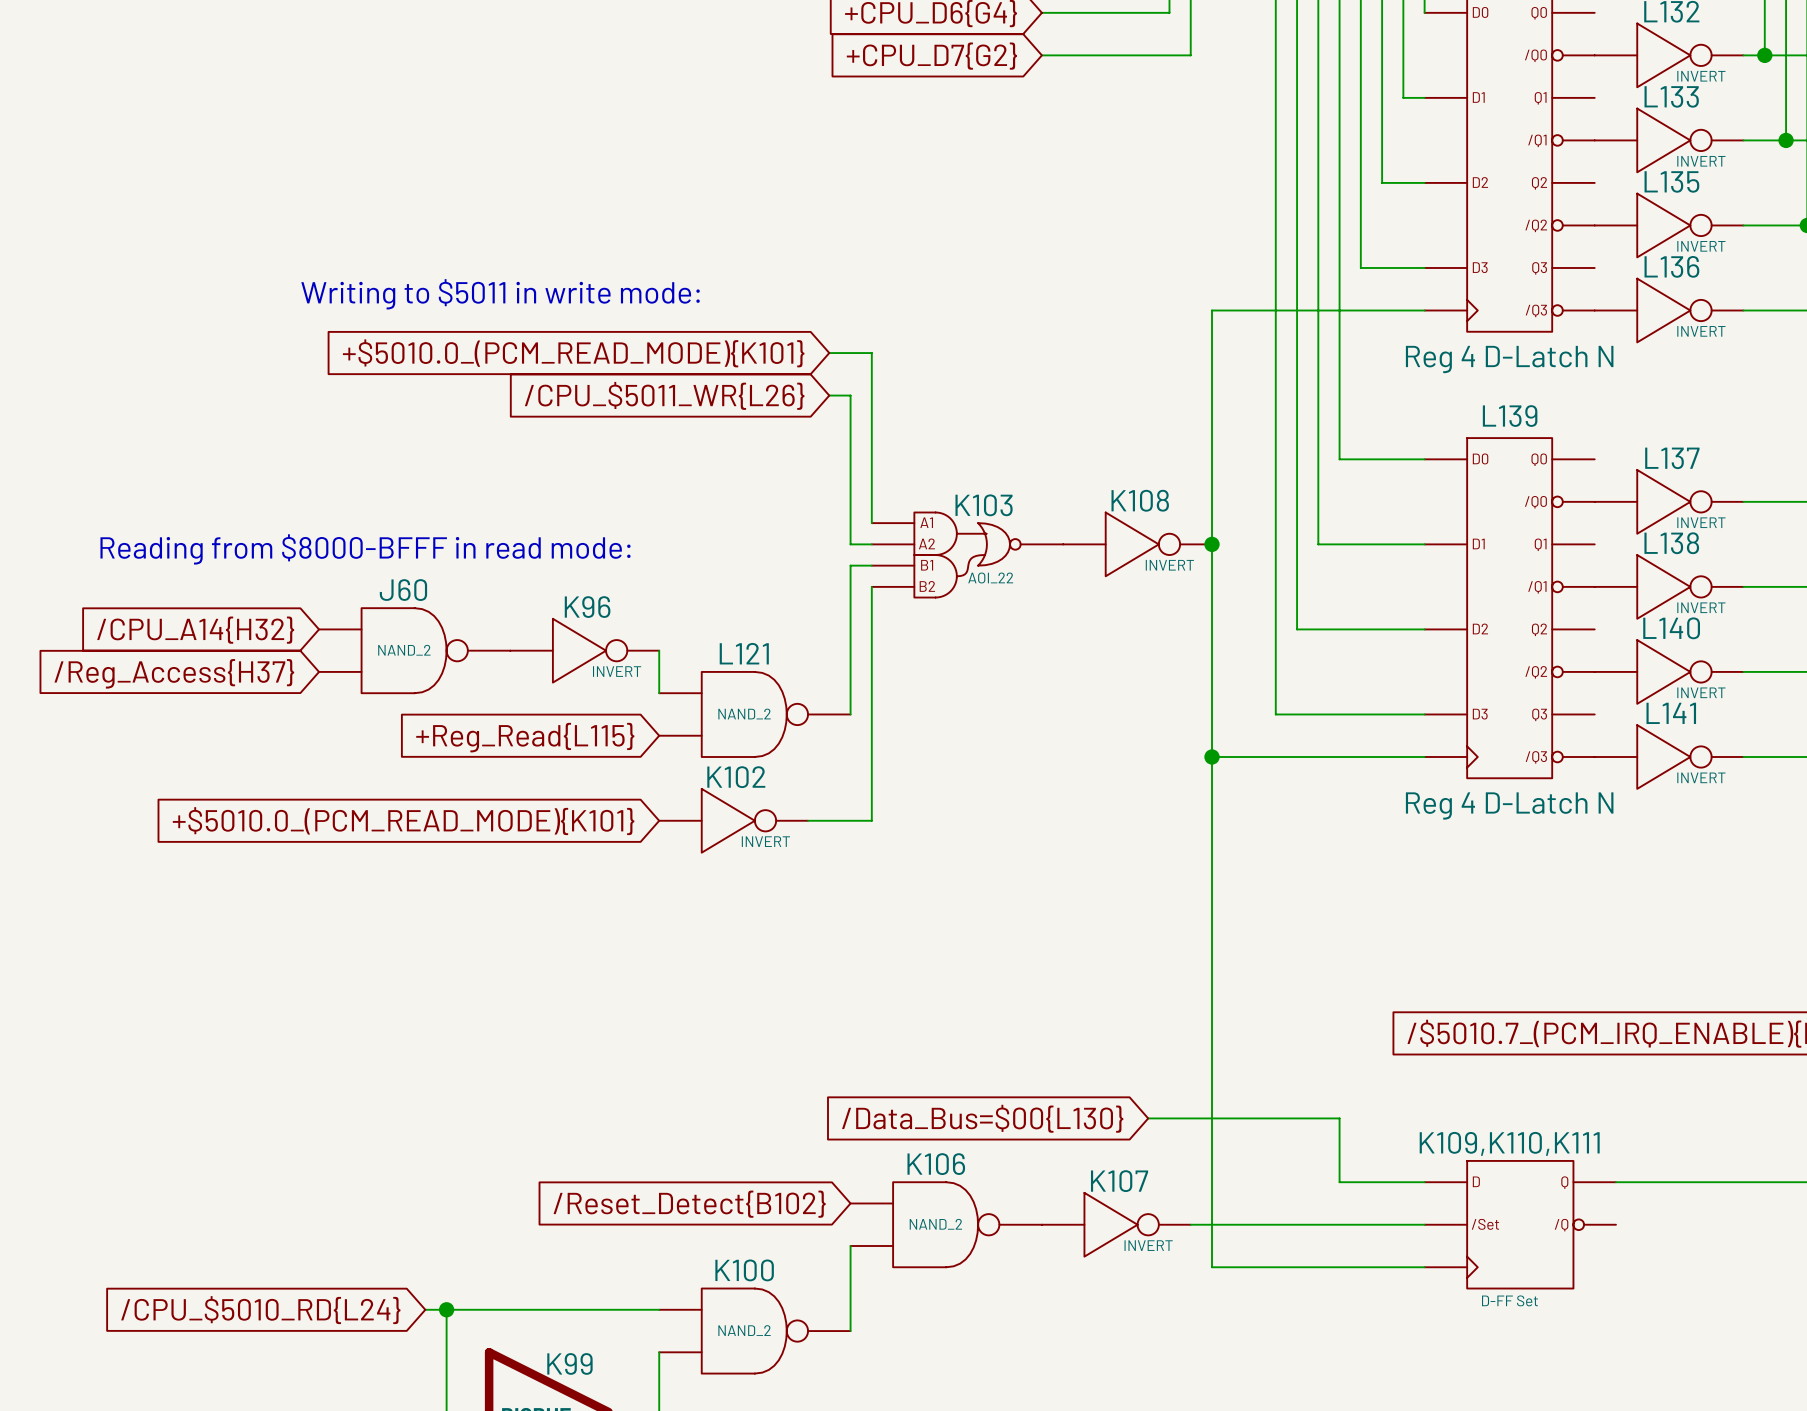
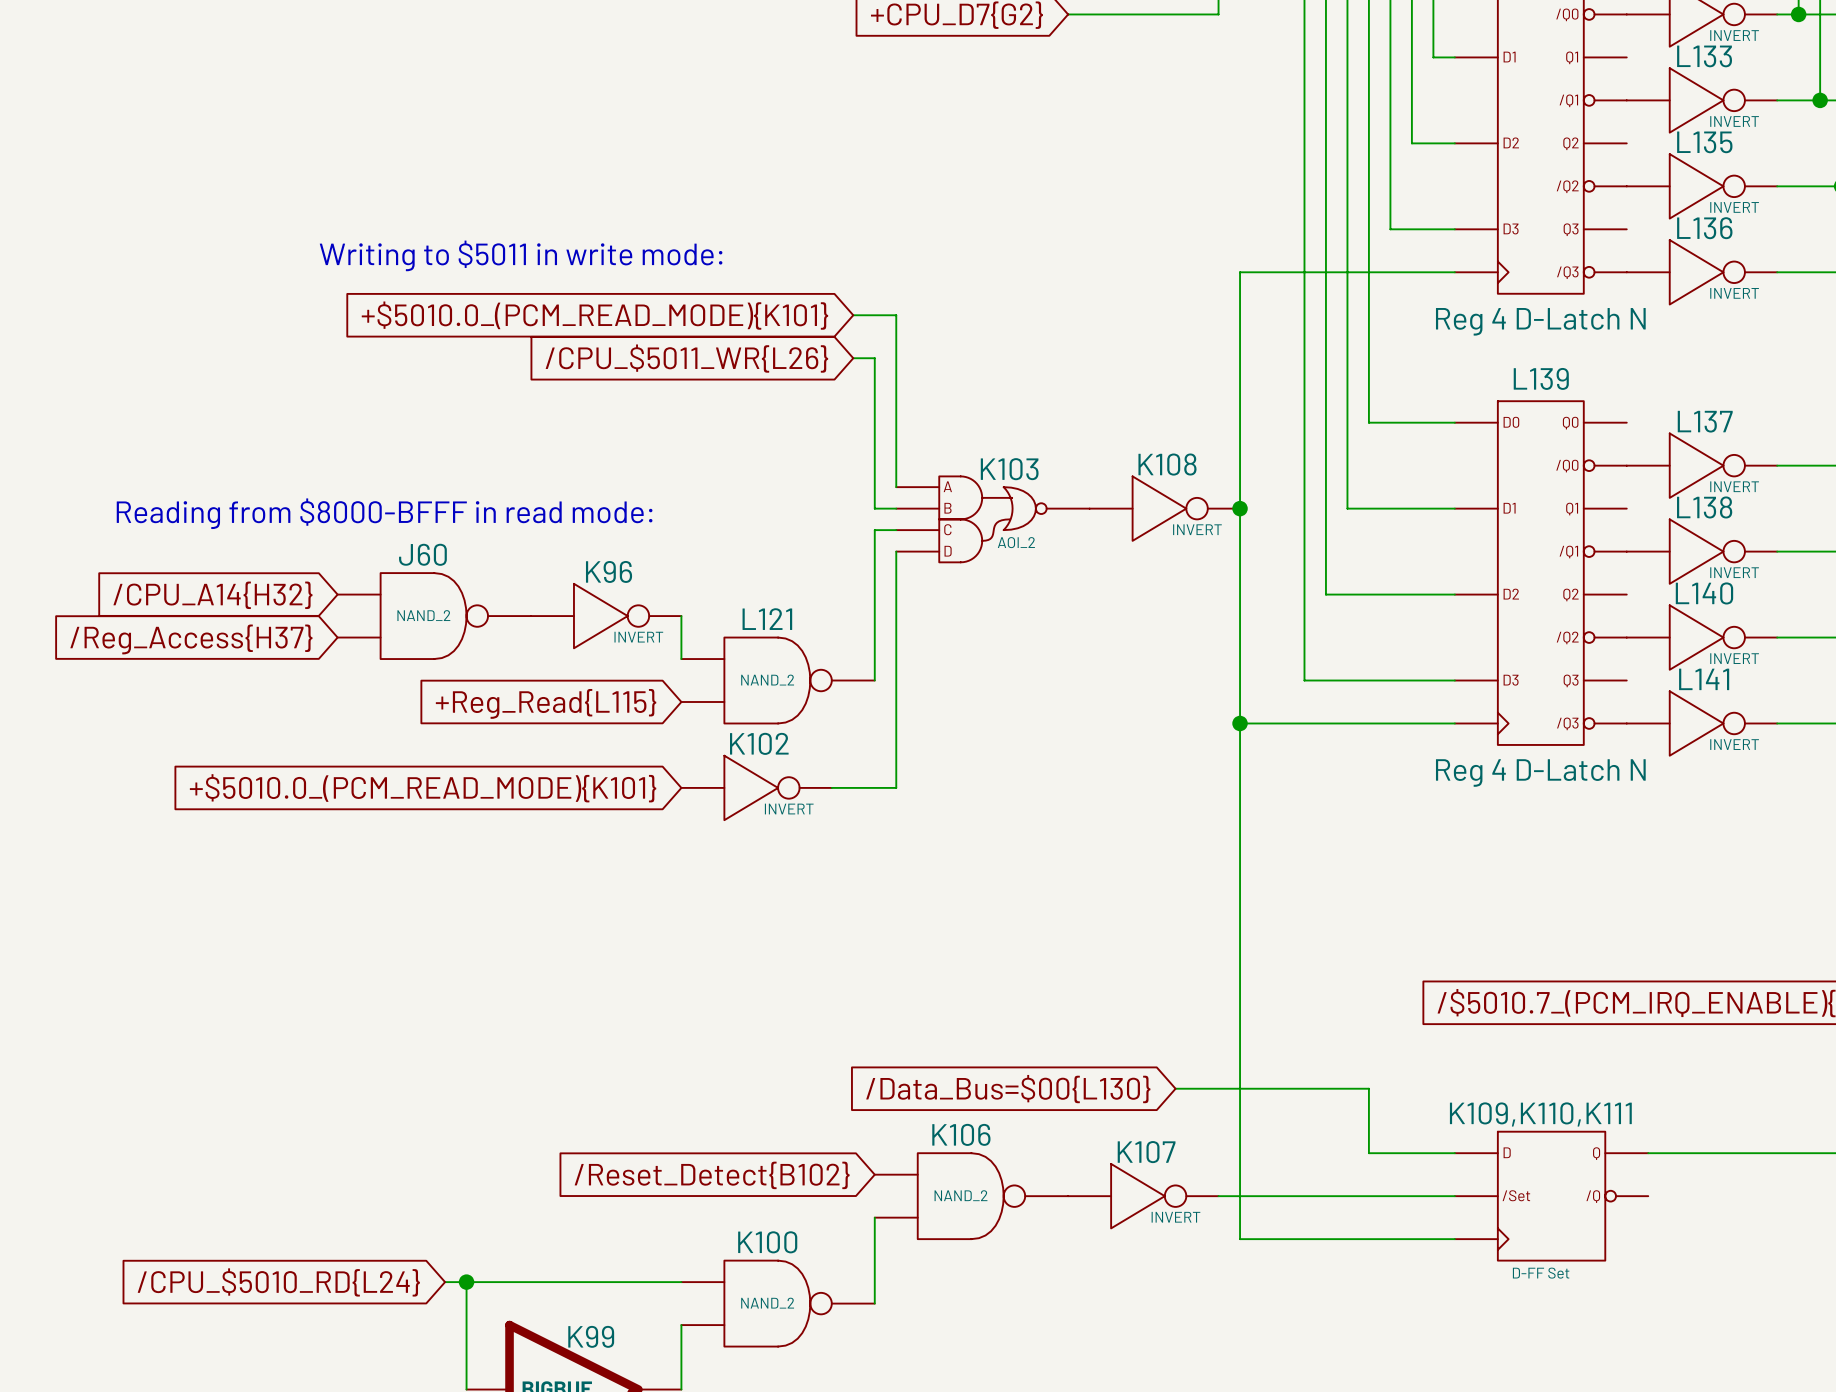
K103 text: none -> A (947, 486)
K103 text: A1 (926, 522) -> none
K103 text: none -> B (947, 508)
K103 text: A2 (926, 543) -> none
K103 text: none -> C (947, 529)
K103 text: B1 (927, 565) -> none
K103 value: AOI_22 (990, 578) -> AOI_2 (1016, 542)
K103 text: none -> D (948, 551)
K103 text: B2 (927, 586) -> none

